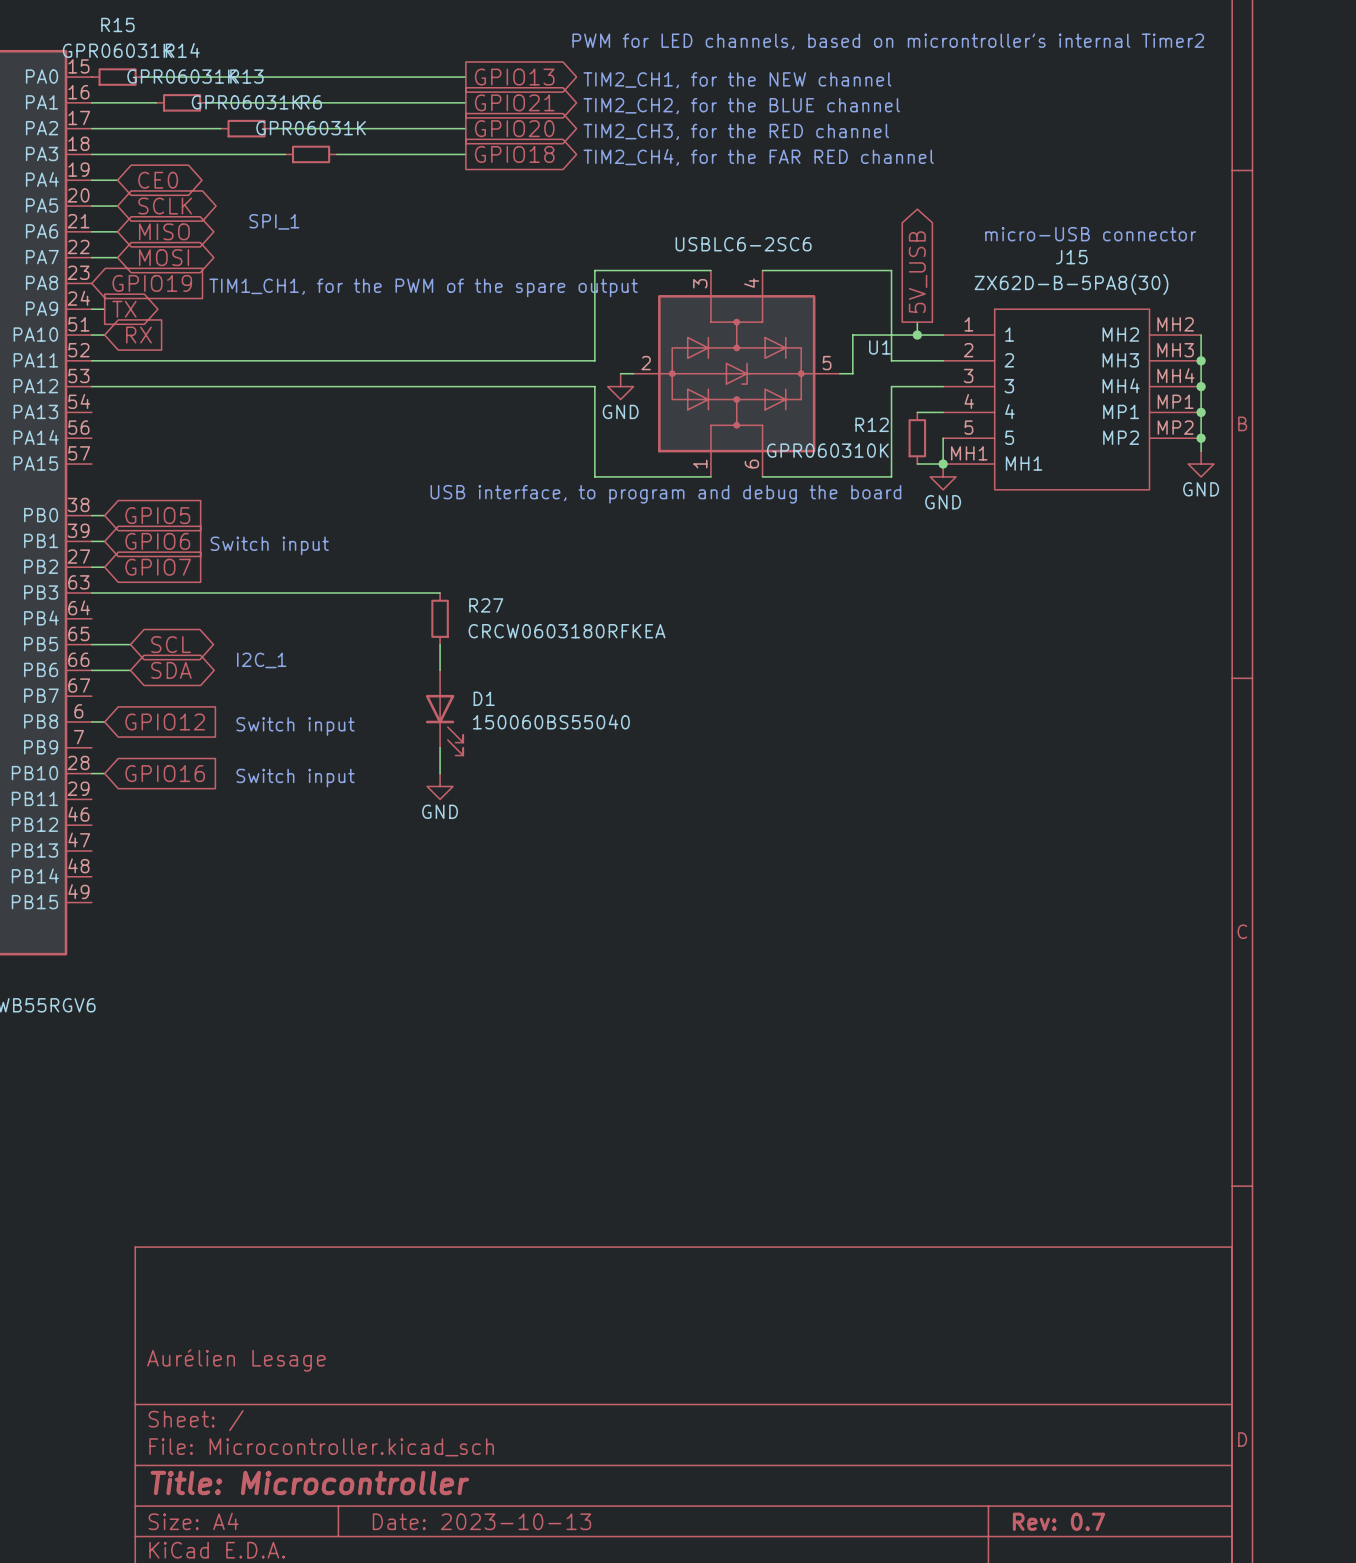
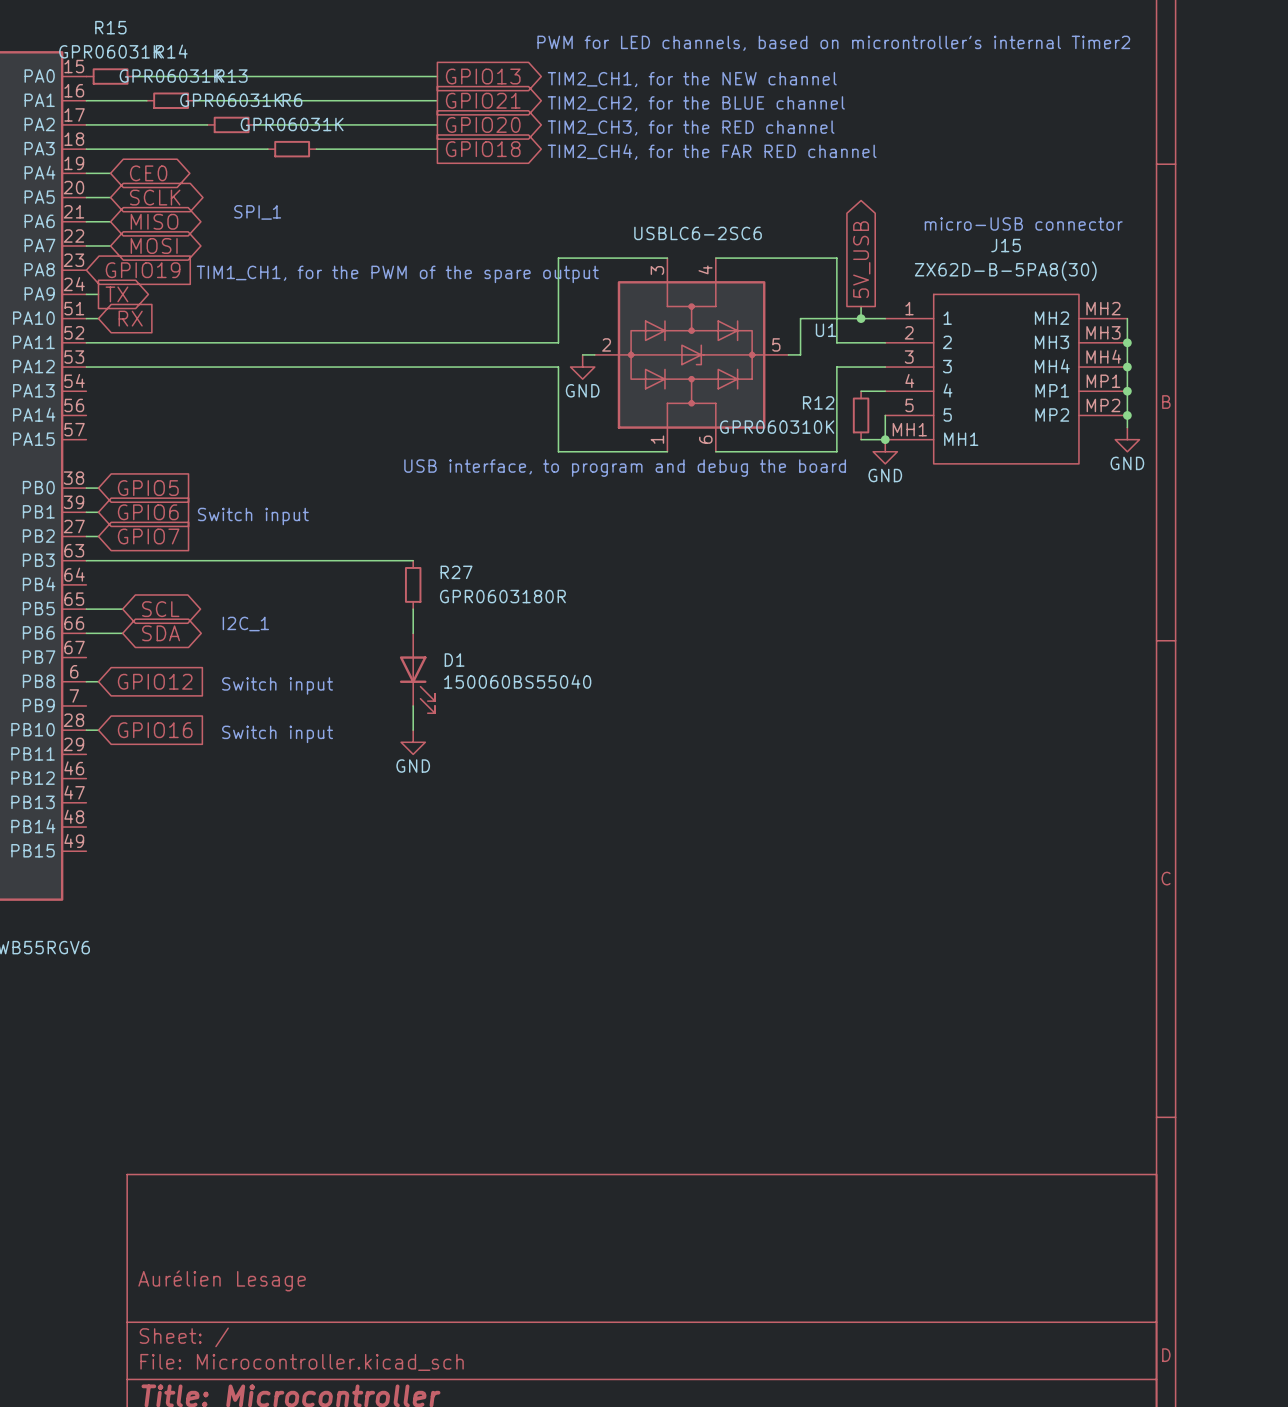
R27 value: CRCW0603180RFKEA (567, 631) -> GPR0603180R (502, 596)

